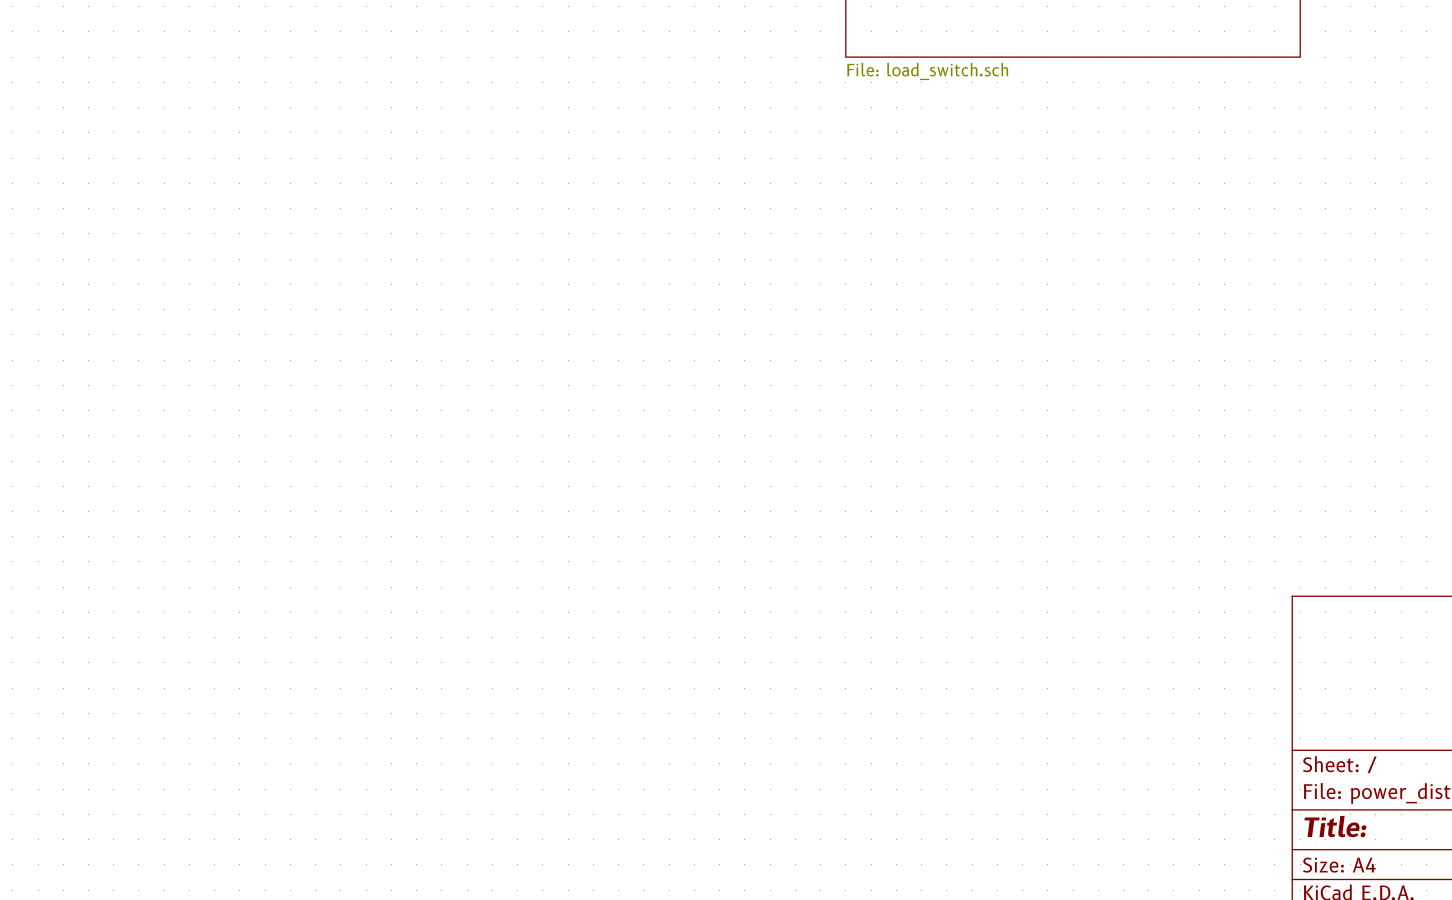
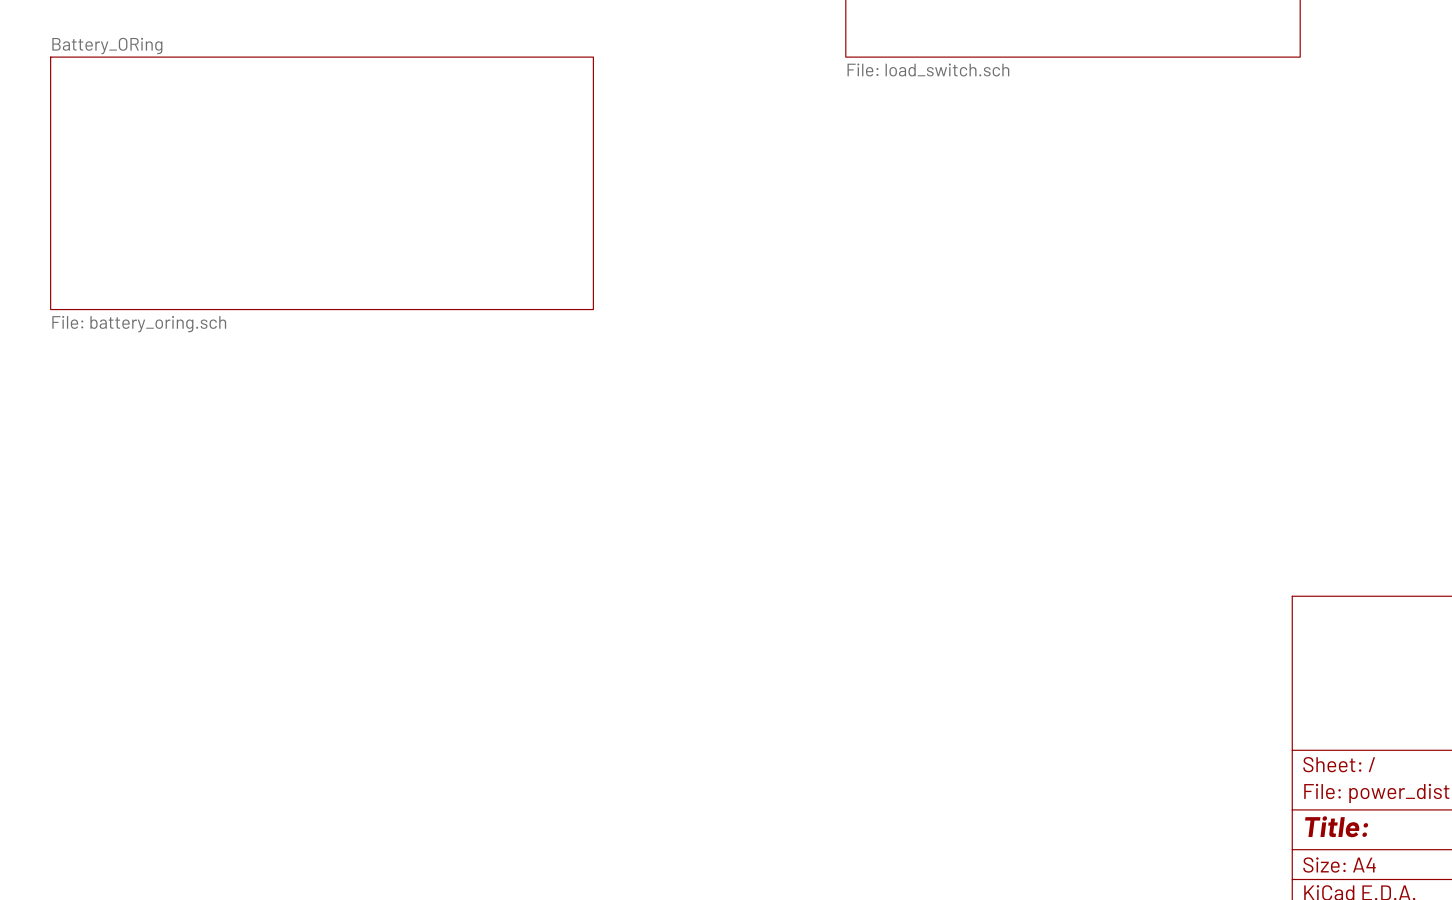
sheet Battery_ORing: none -> File: battery_oring.sch (322, 183)

